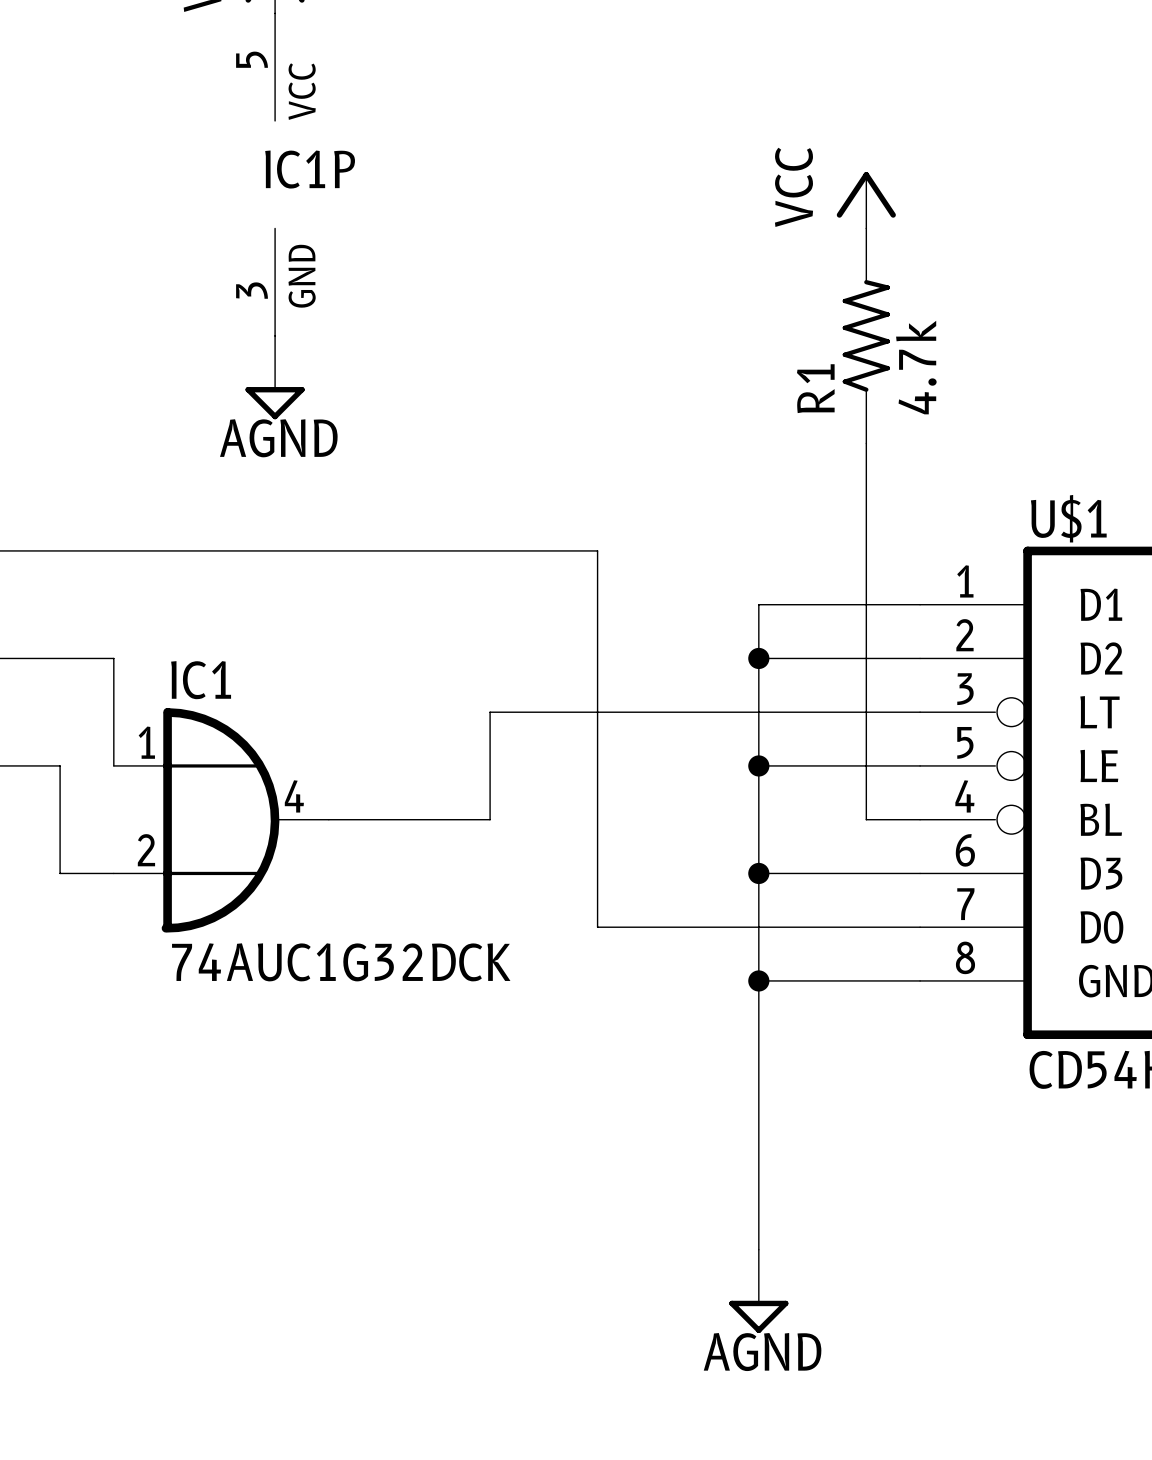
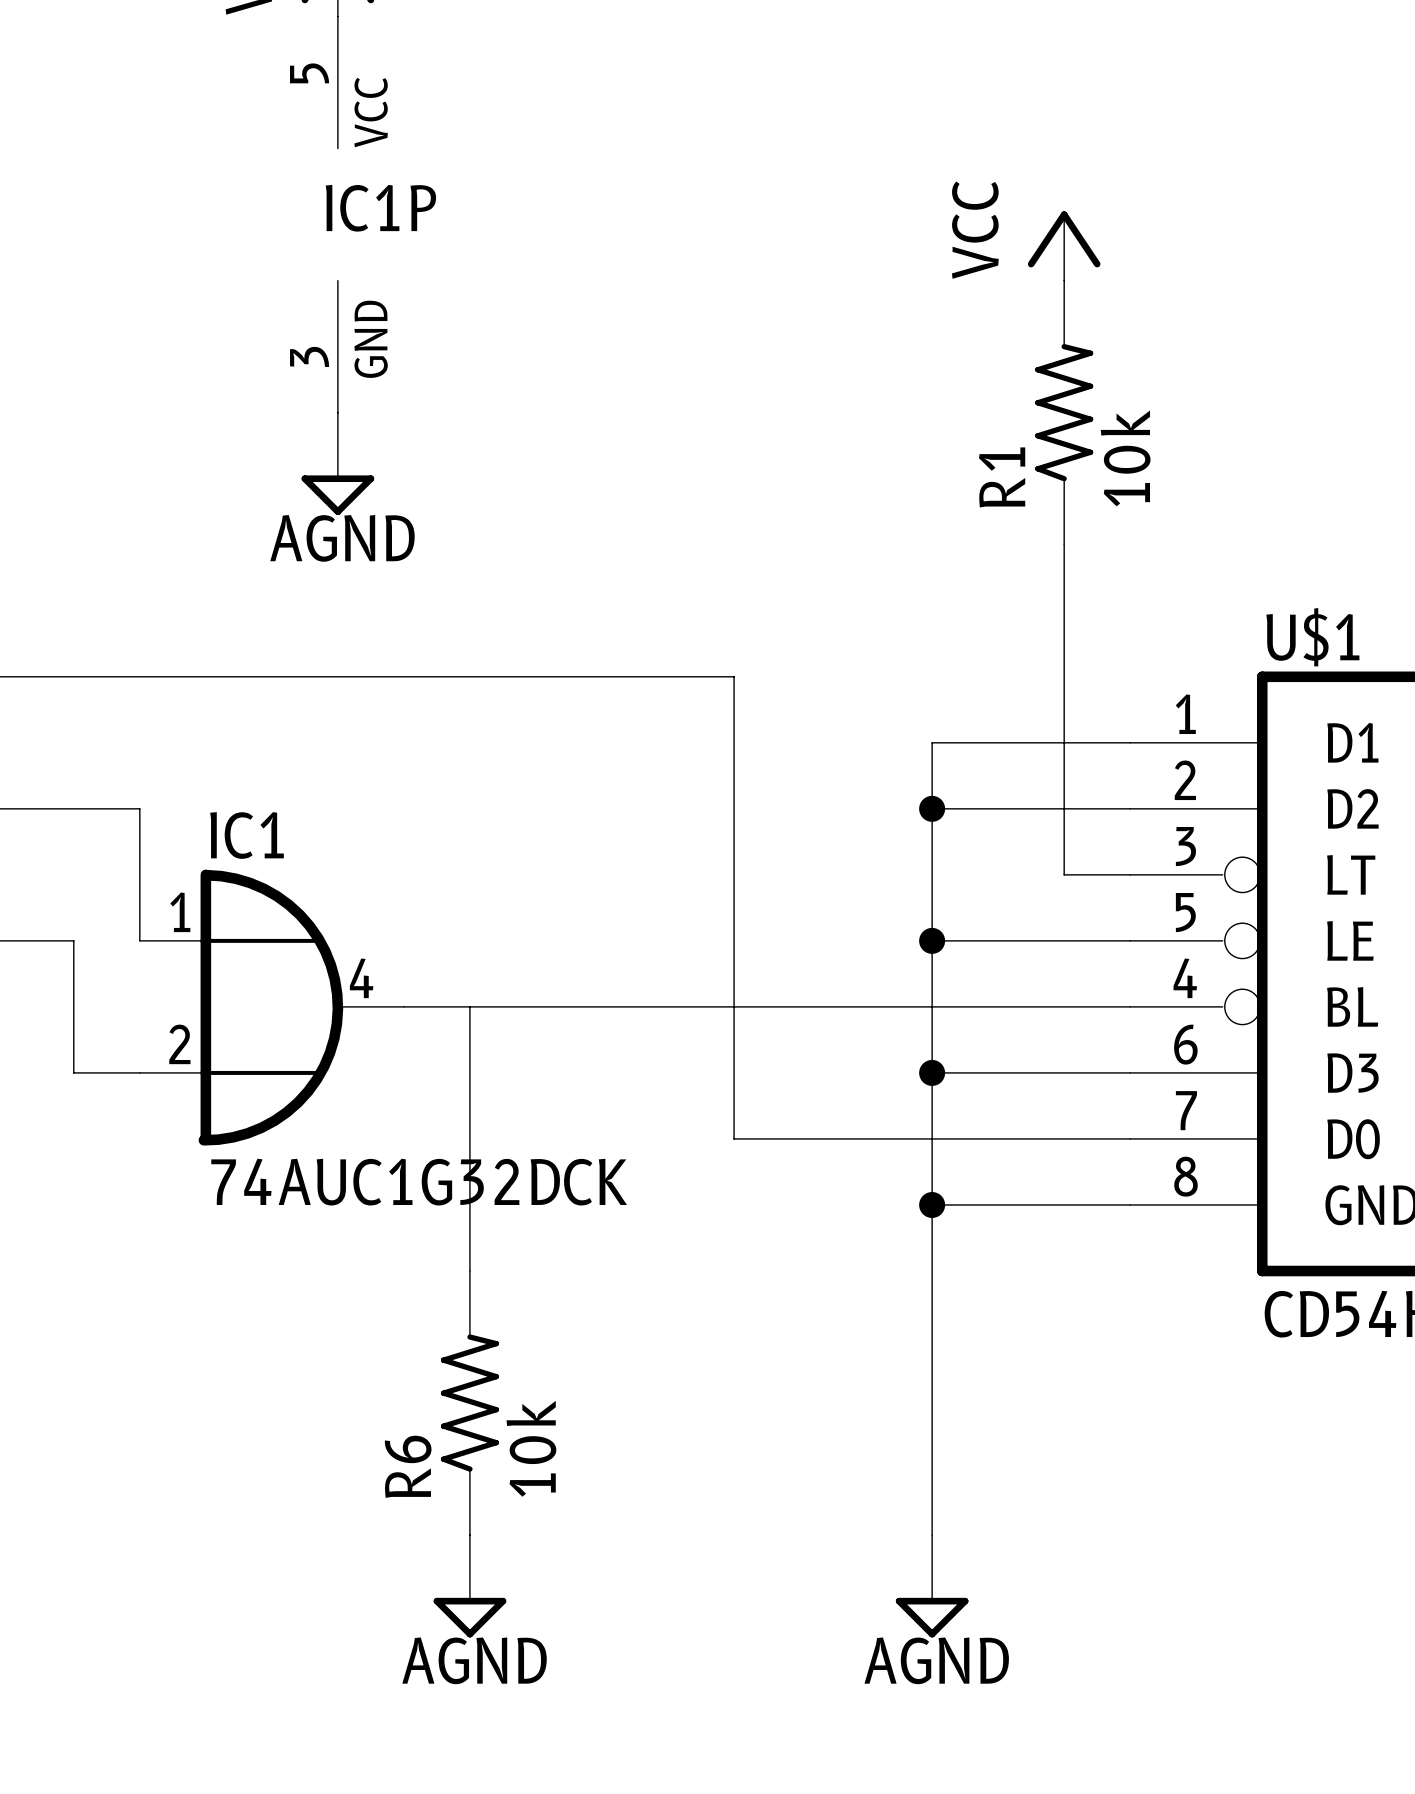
R1 value: 4.7k (916, 367) -> 10k (1125, 458)
wire: none -> (469, 1006) (469, 1271)
wire: (490, 819) (490, 712) (866, 712) (866, 819) -> (602, 1006) (1064, 1006)
R6: none -> 10k (469, 1403)
power symbol: none -> AGND (469, 1586)

